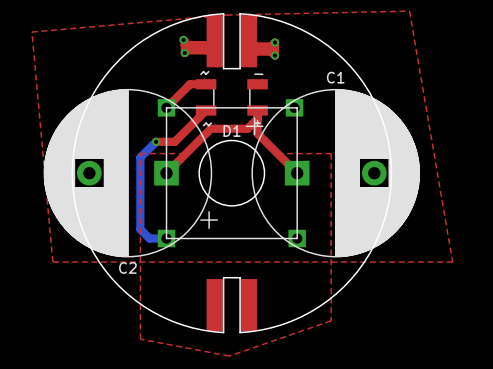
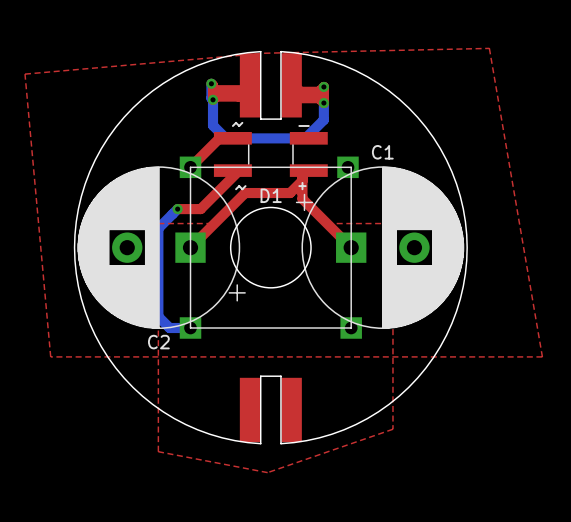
bottom track: none -> (211, 83) (213, 125) (225, 138) (305, 138) (323, 119) (323, 86)
D1 footprint: [195, 70, 268, 127] -> [213, 121, 328, 191]
C2 footprint: [43, 89, 218, 258] -> [77, 166, 246, 330]
C1 footprint: [245, 89, 420, 258] -> [295, 166, 465, 330]

